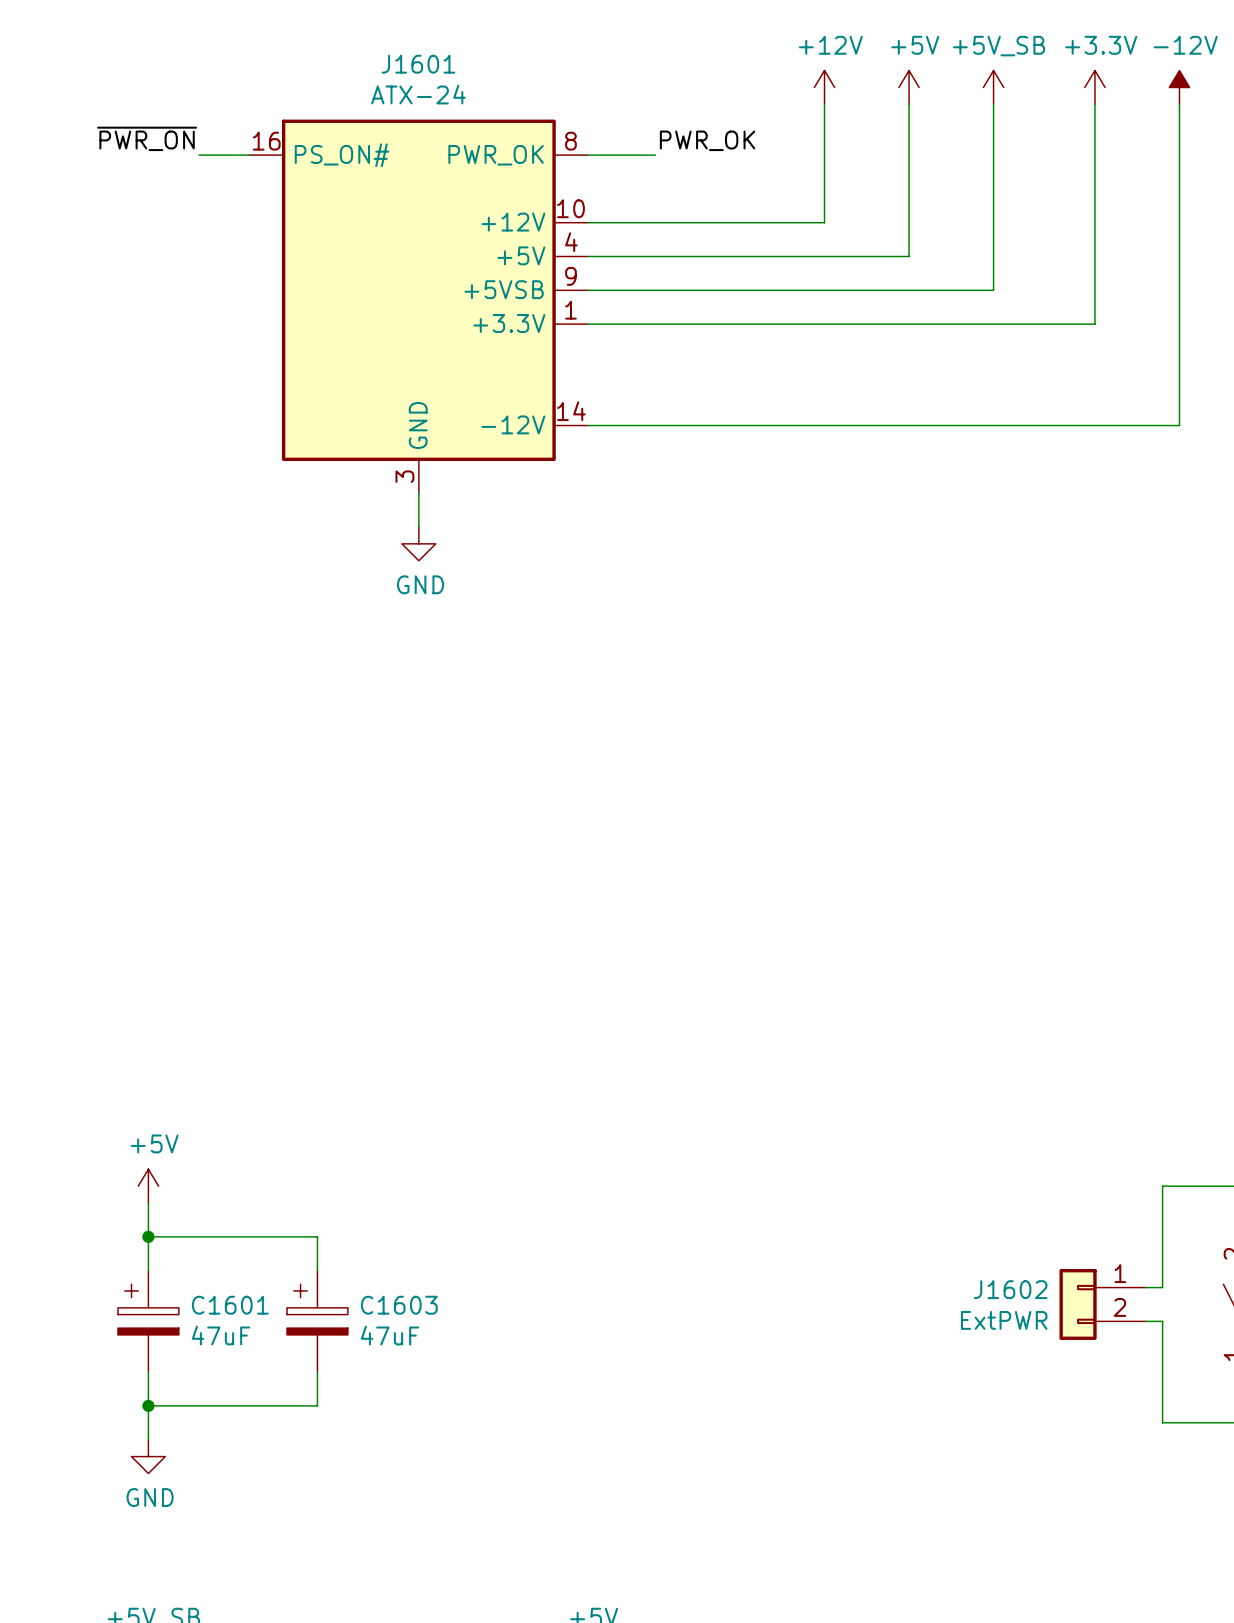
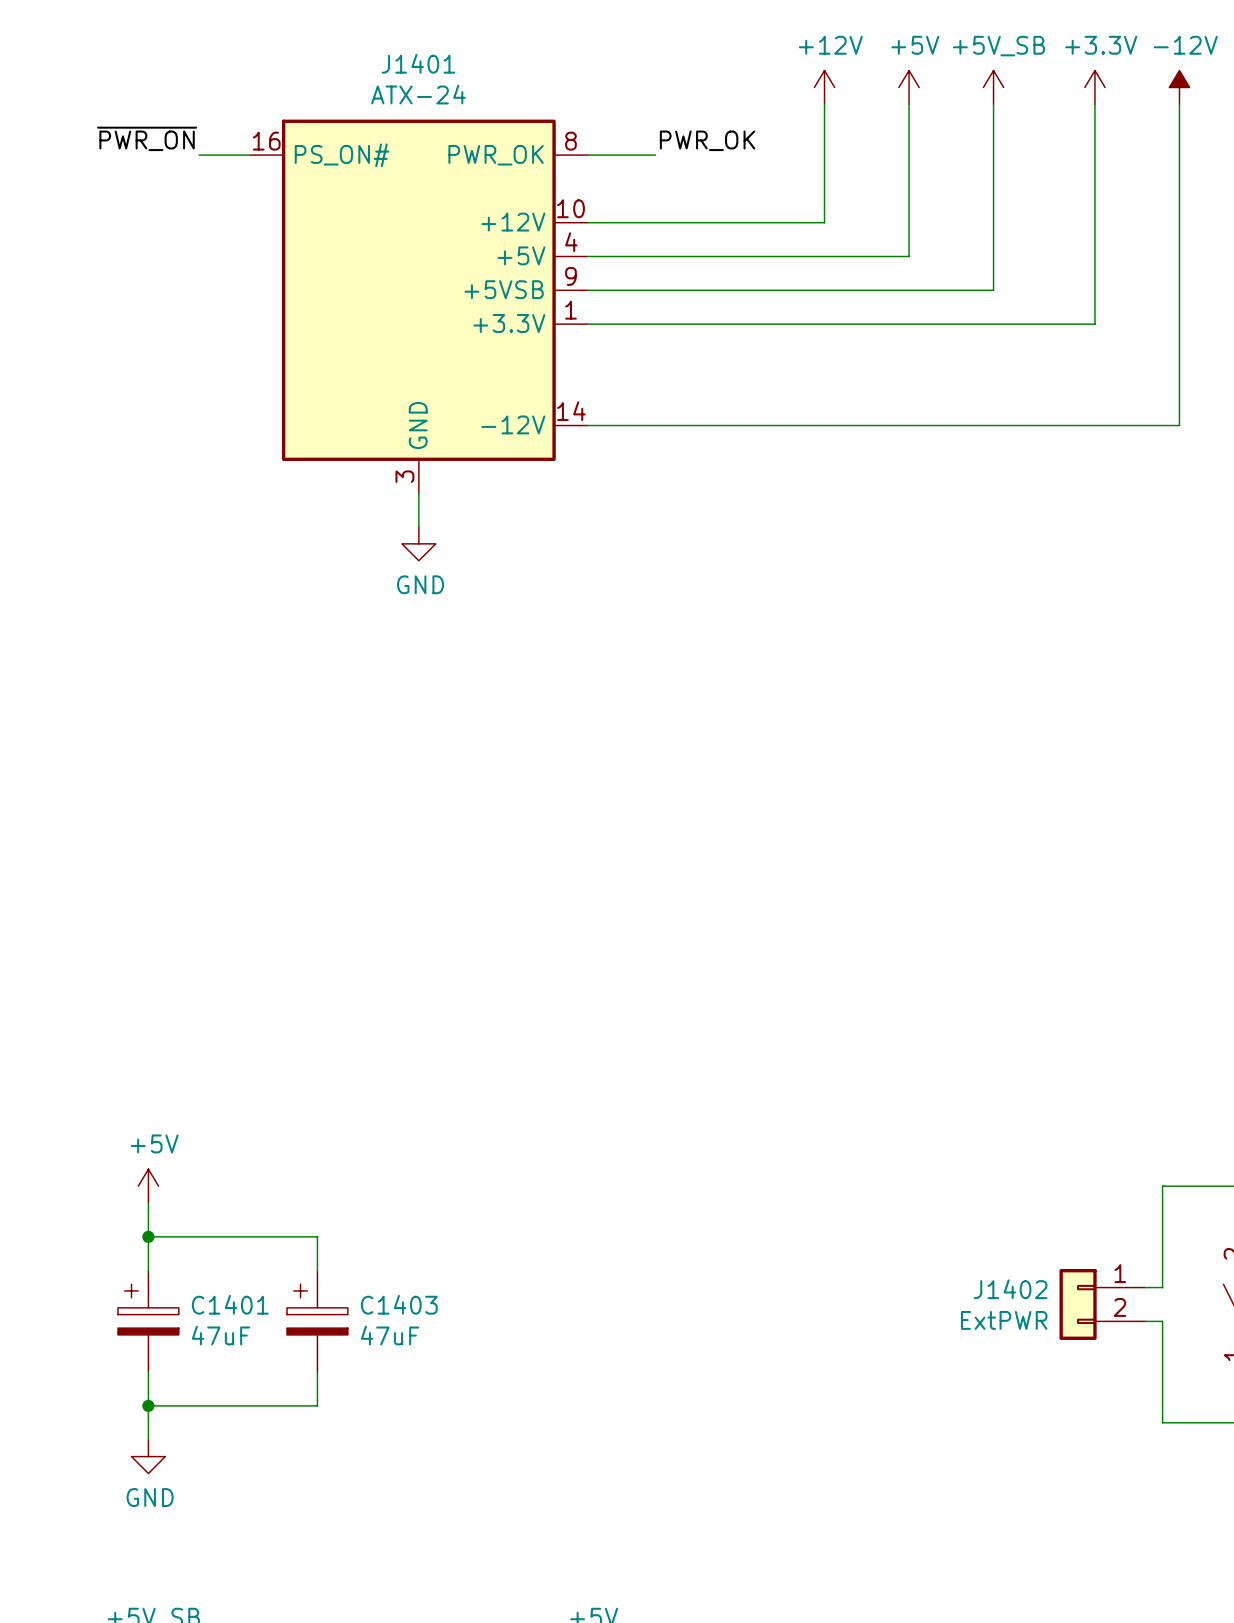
J1601 name: J1601 (418, 64) -> J1401 (418, 63)
J1602 name: J1602 (1010, 1289) -> J1402 (1010, 1289)
C1601 name: C1601 (230, 1305) -> C1401 (230, 1304)
C1603 name: C1603 (399, 1305) -> C1403 (399, 1304)

